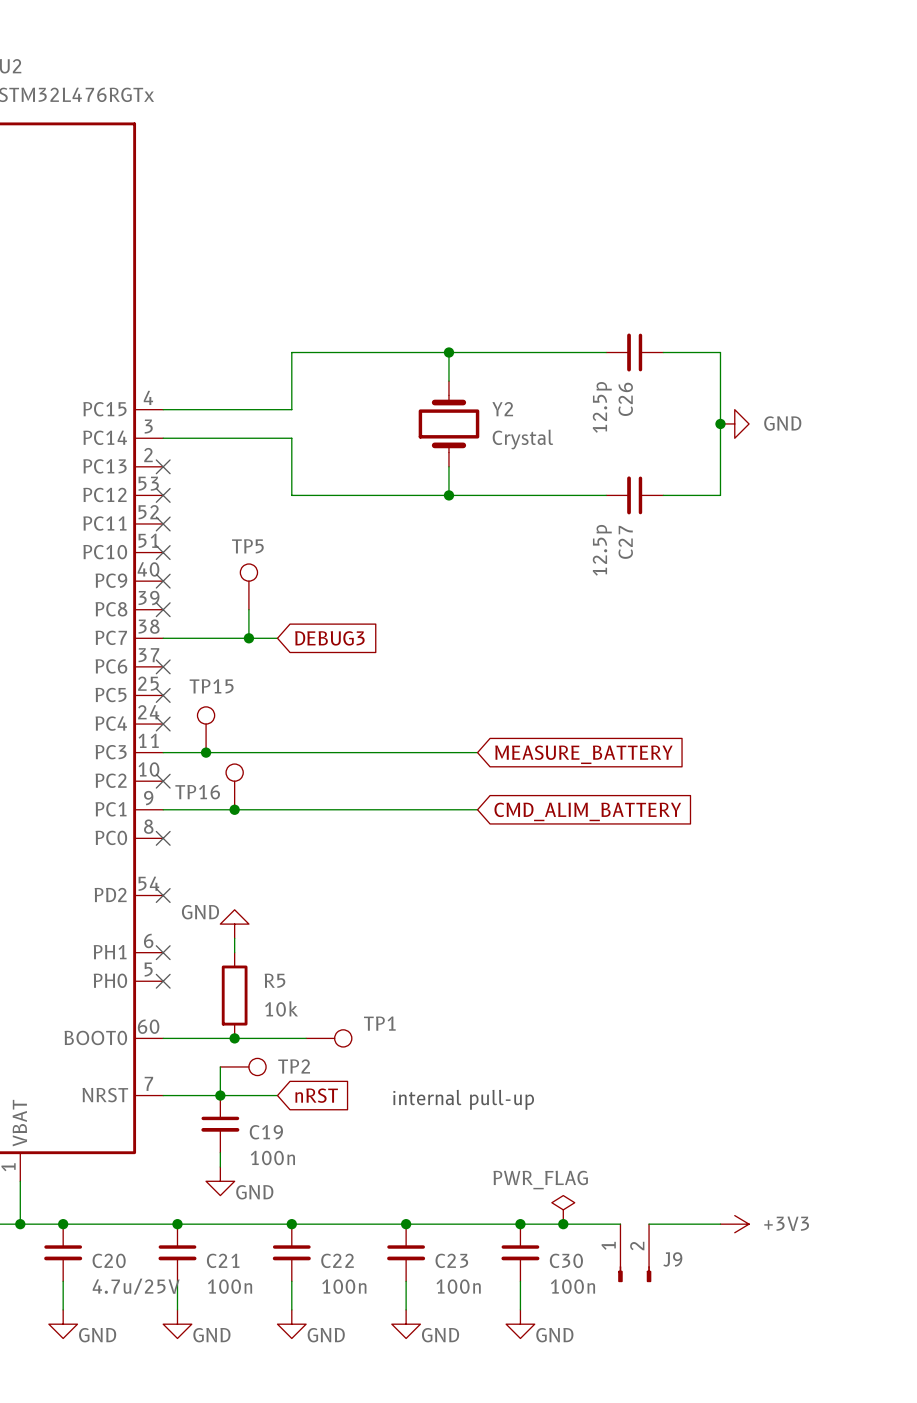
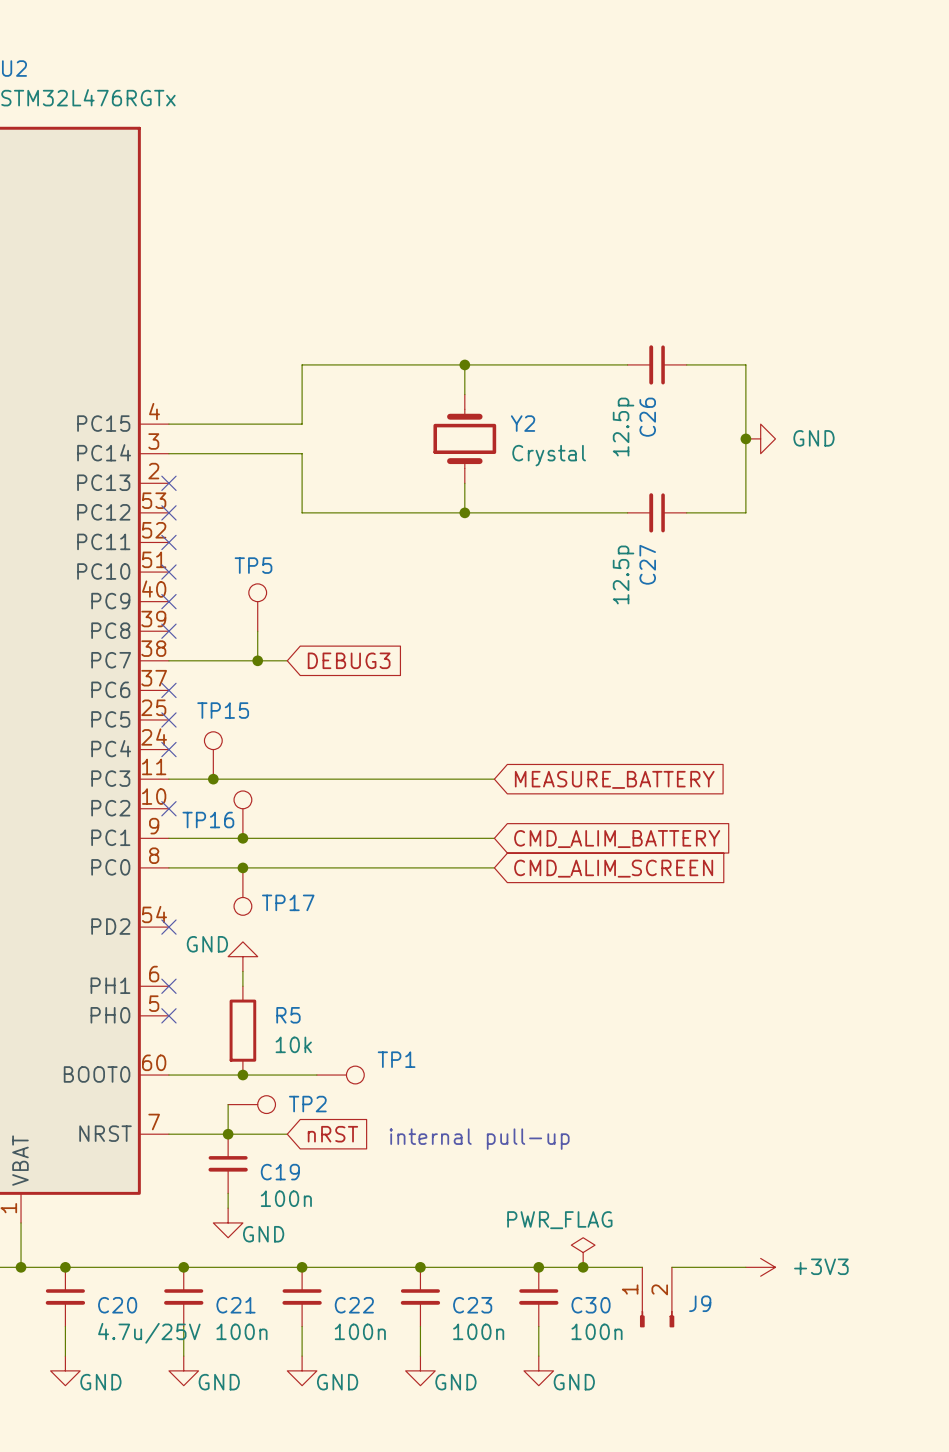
wire: none -> (168, 867) (494, 867)
no-connect mark: (163, 838) -> none
junction: none -> (242, 867)
global label: none -> CMD_ALIM_SCREEN (613, 868)
TP17: none -> (242, 891)

